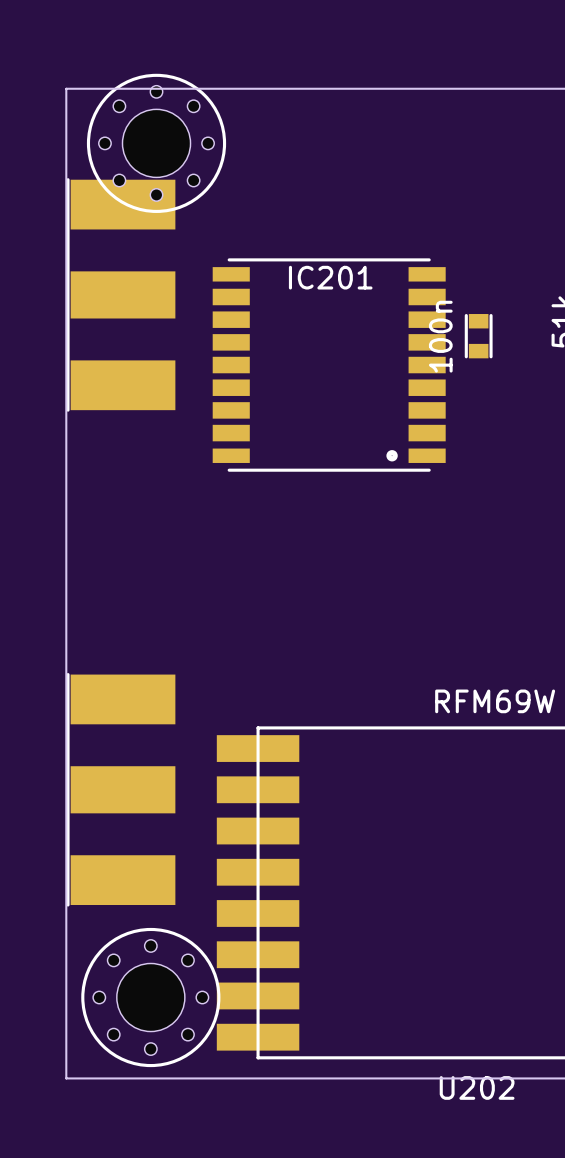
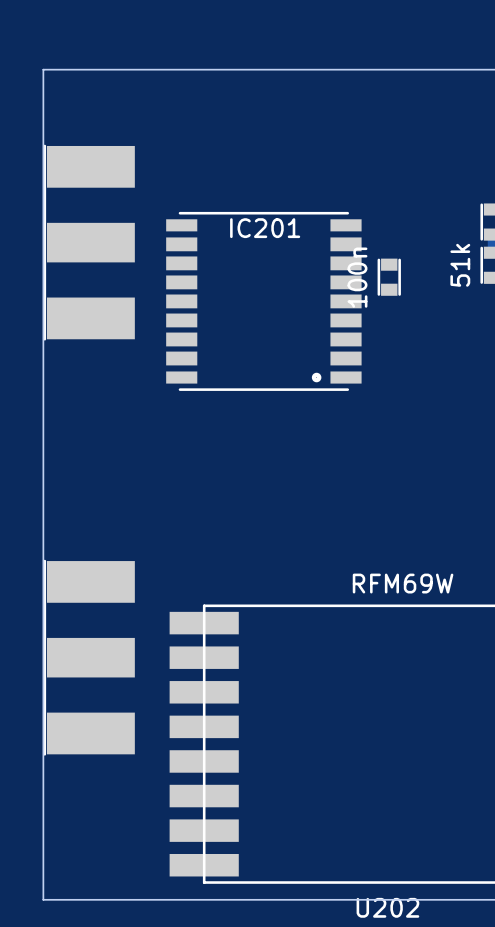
part: (156, 143) -> none
part: (150, 997) -> none

